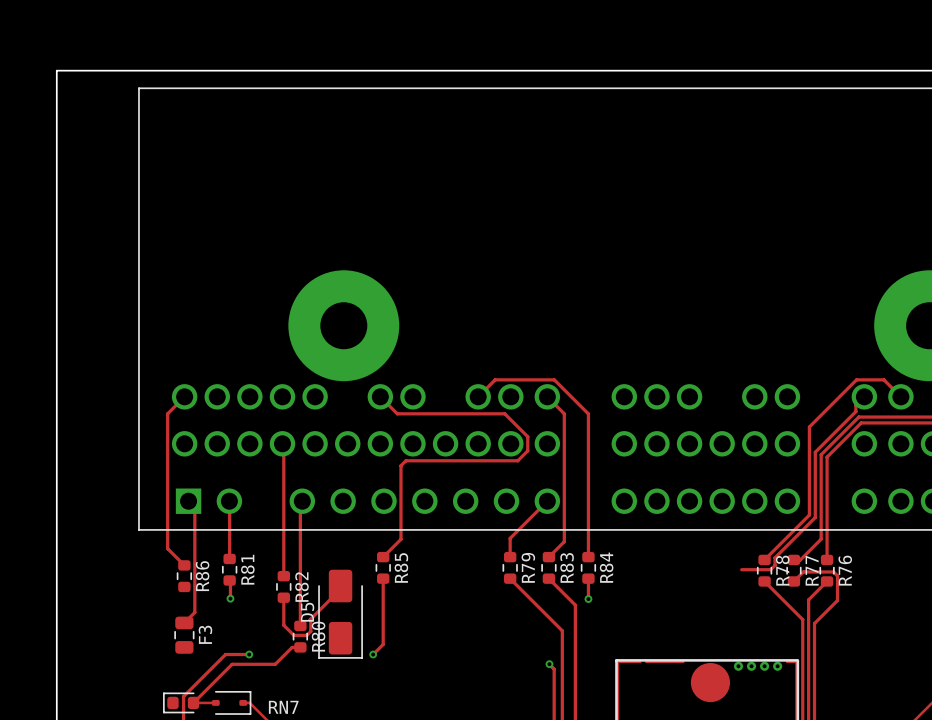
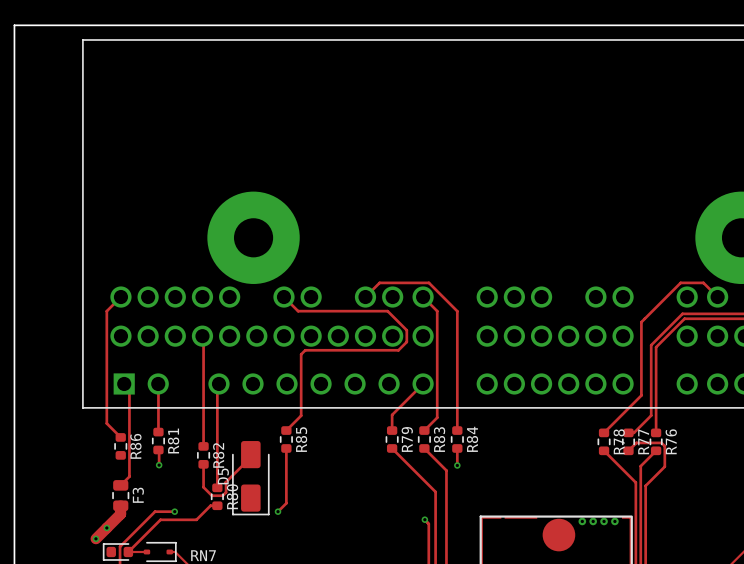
track: (864, 396) (855, 405) (855, 411) (815, 452) (815, 517) (775, 557) (775, 565) (770, 569) (741, 569) -> none
track: none -> (120, 505) (120, 514) (95, 538)
via: none -> (106, 527)
via: none -> (95, 538)

